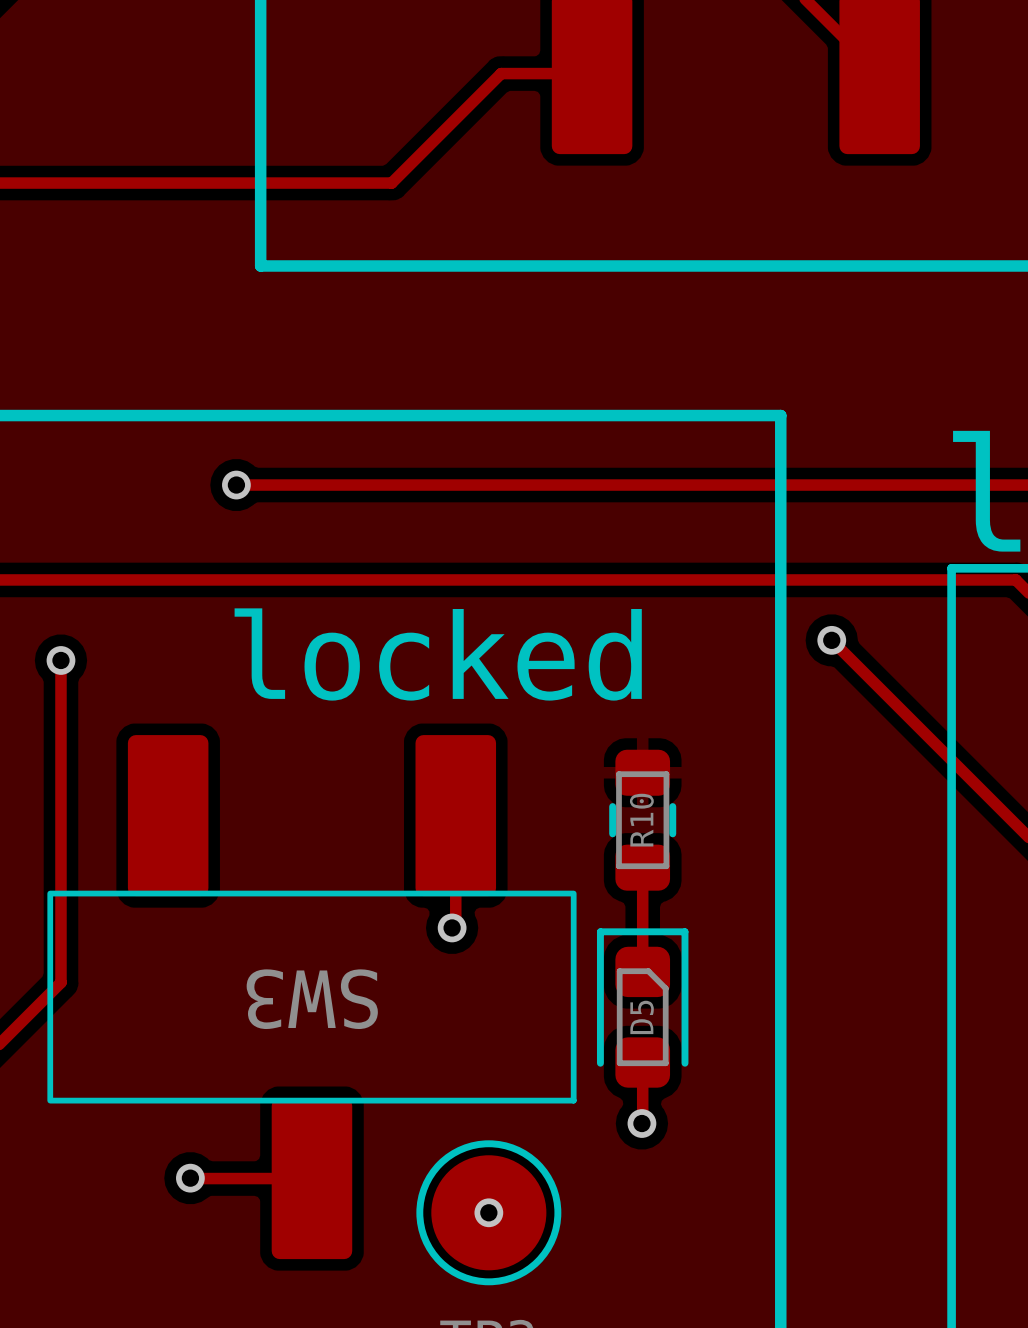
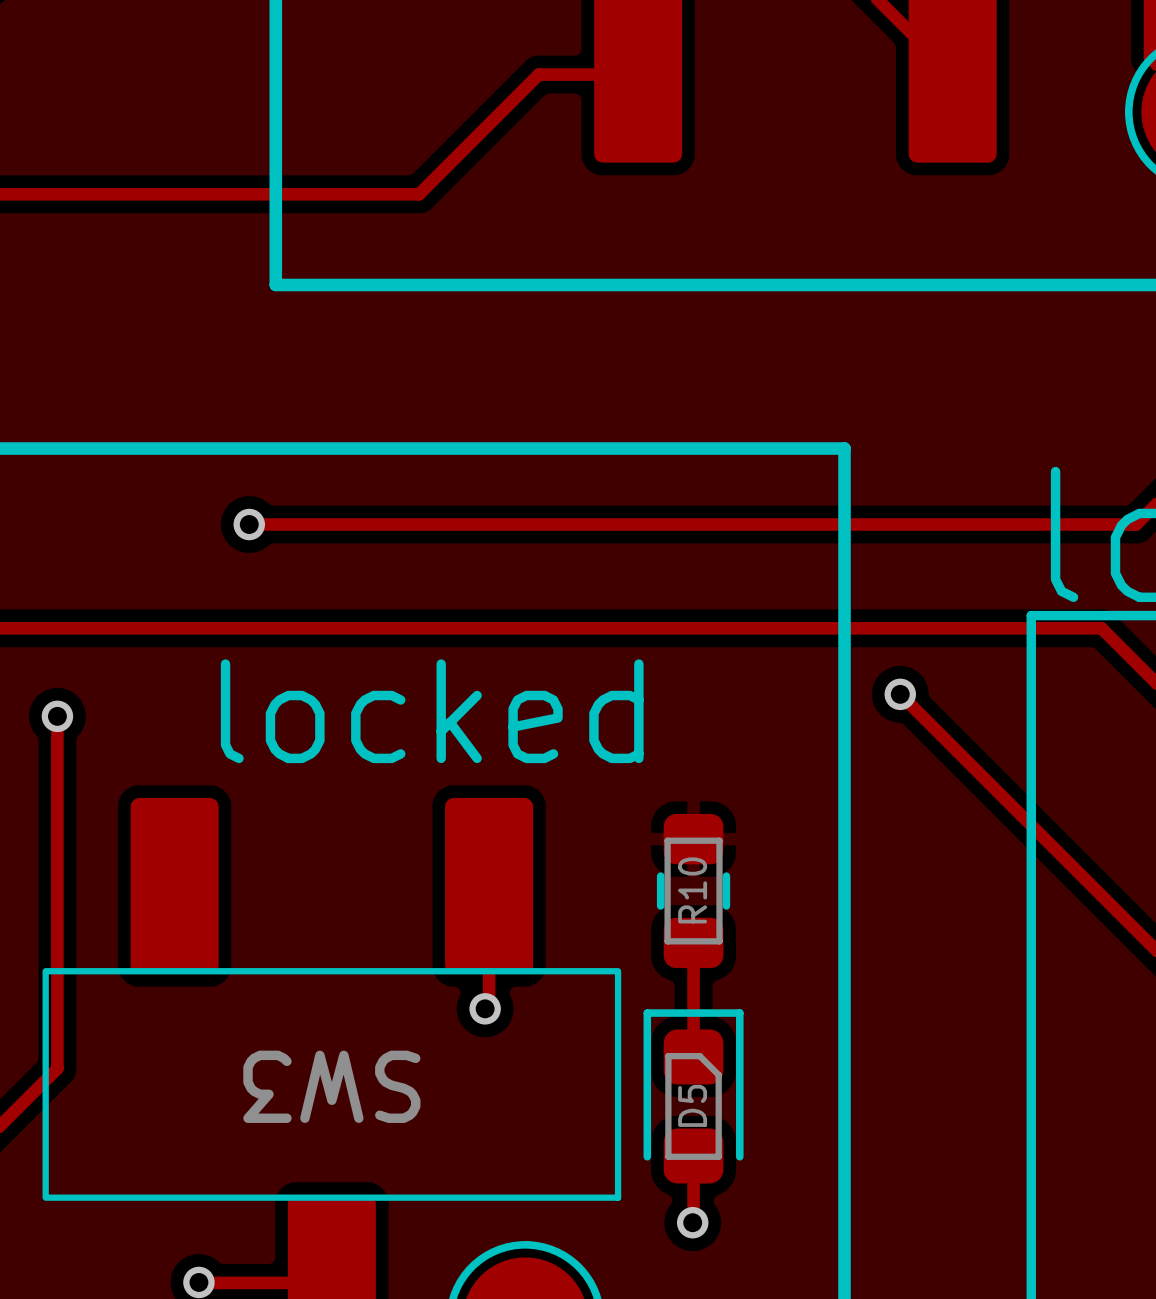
text position: locked (438, 654) -> locked (432, 711)

